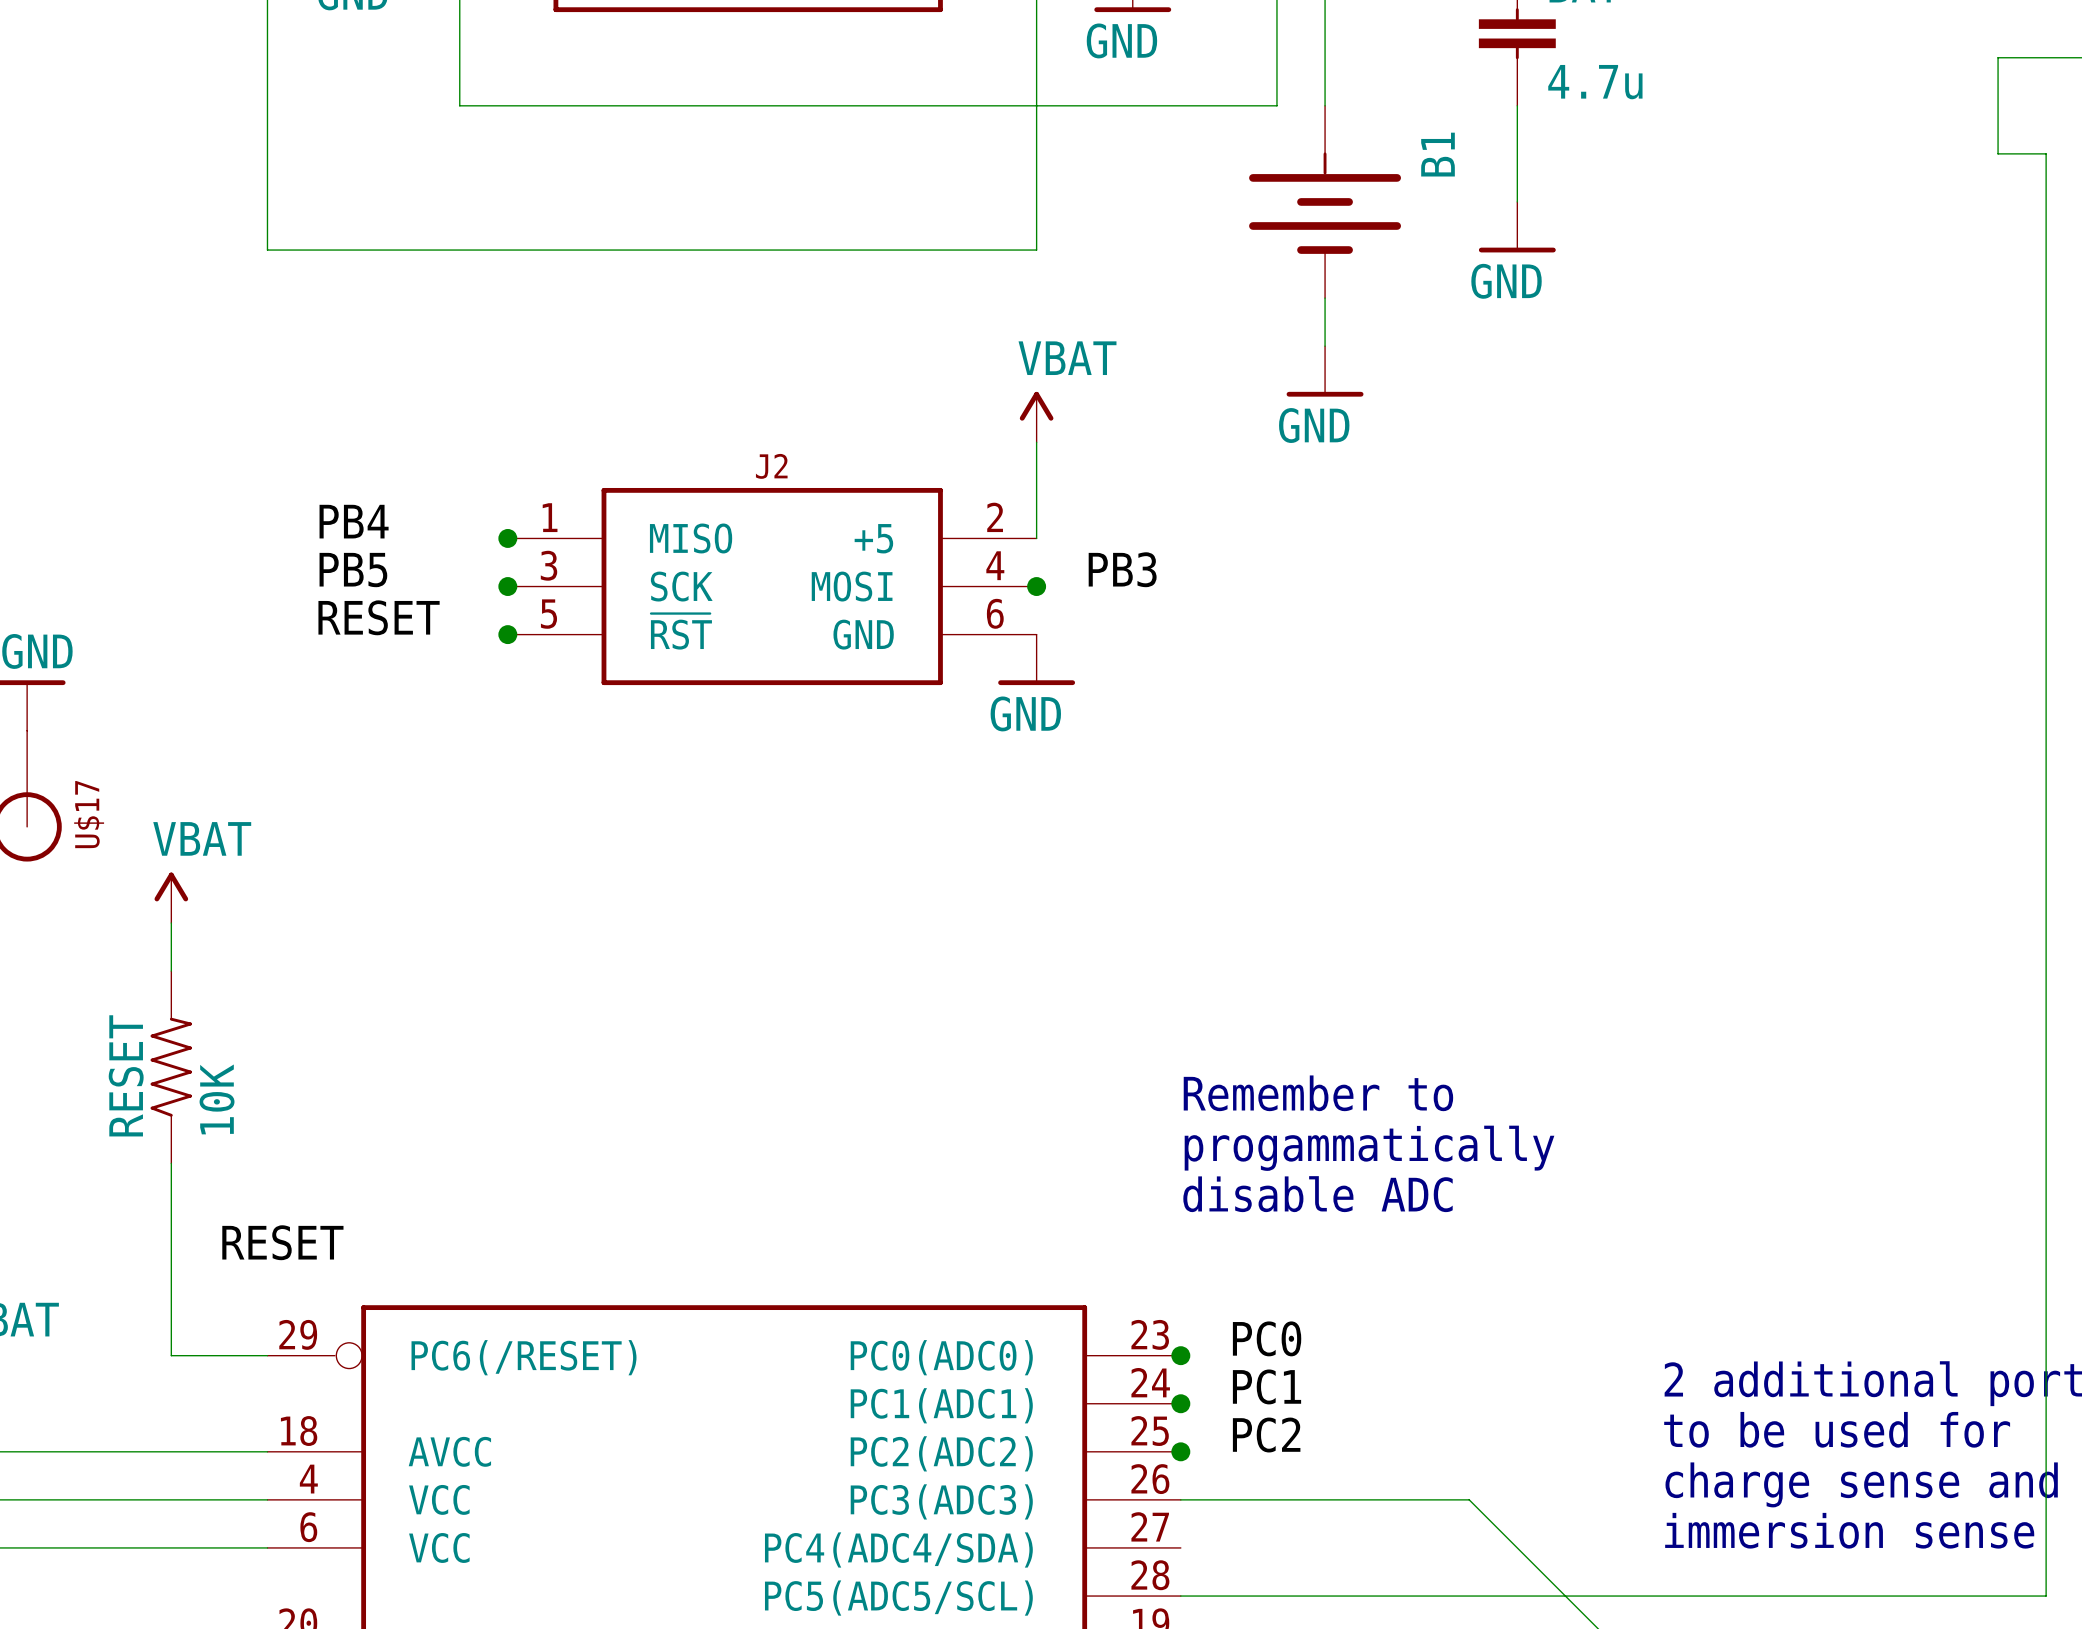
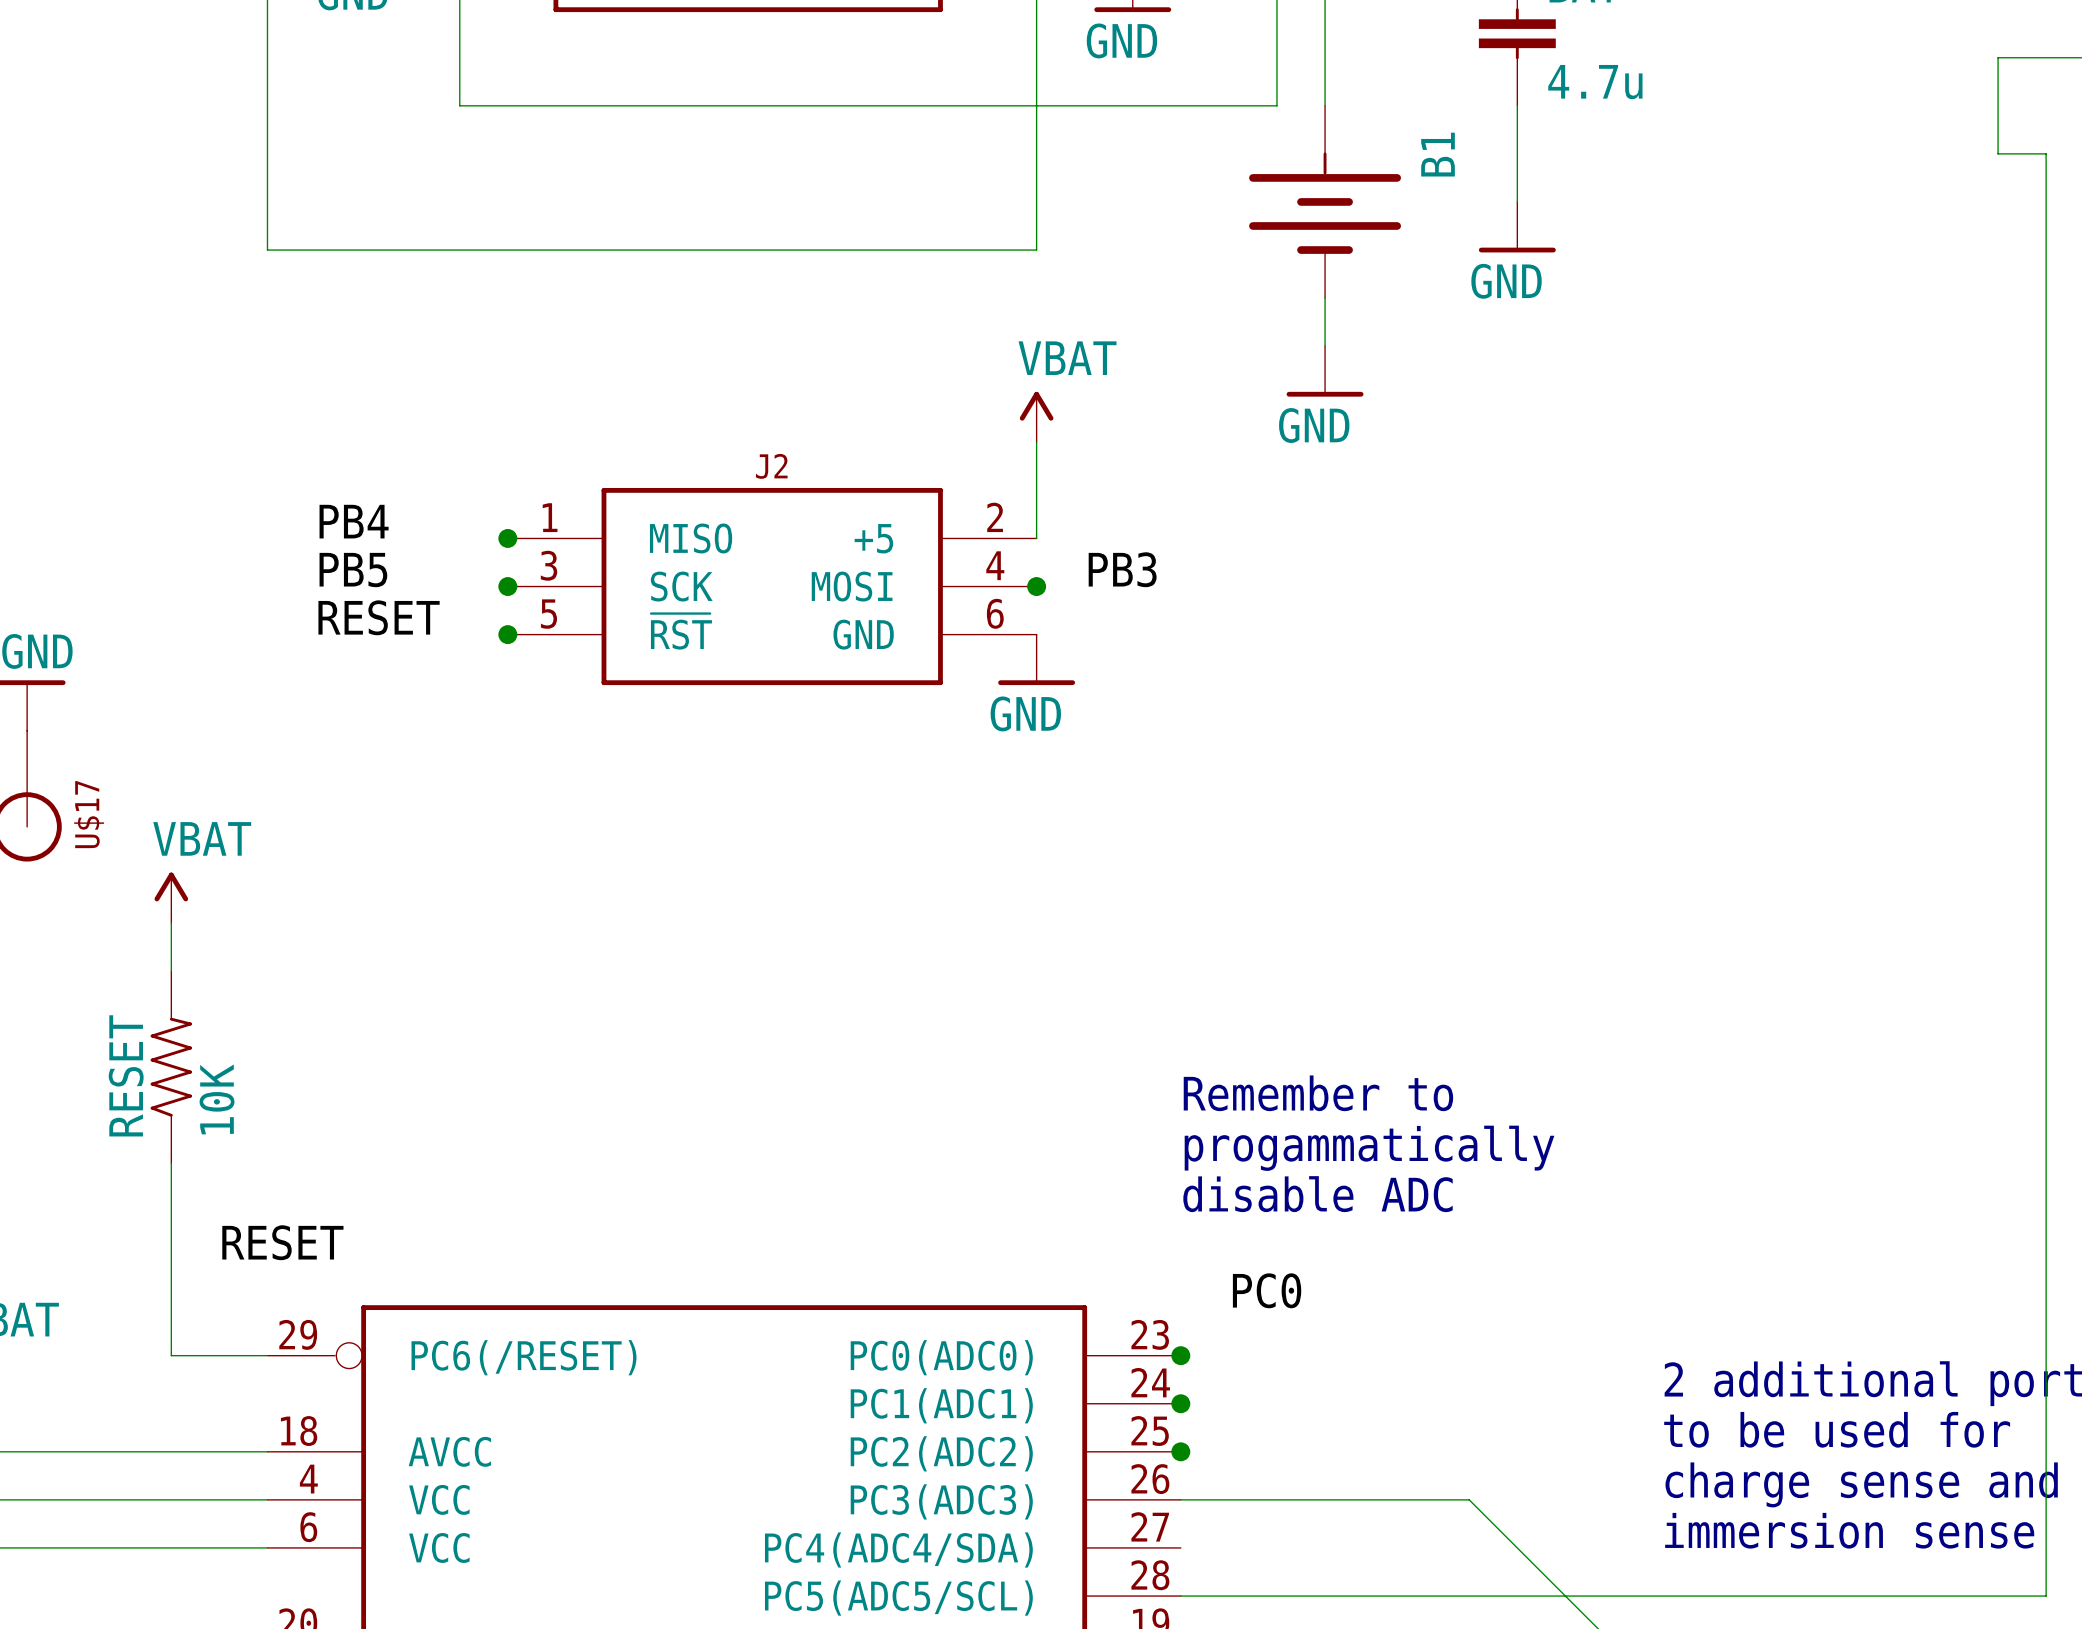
label position: PC0 (1267, 1338) -> PC0 (1267, 1290)
label: PC1 (1267, 1386) -> none
label: PC2 (1266, 1435) -> none

